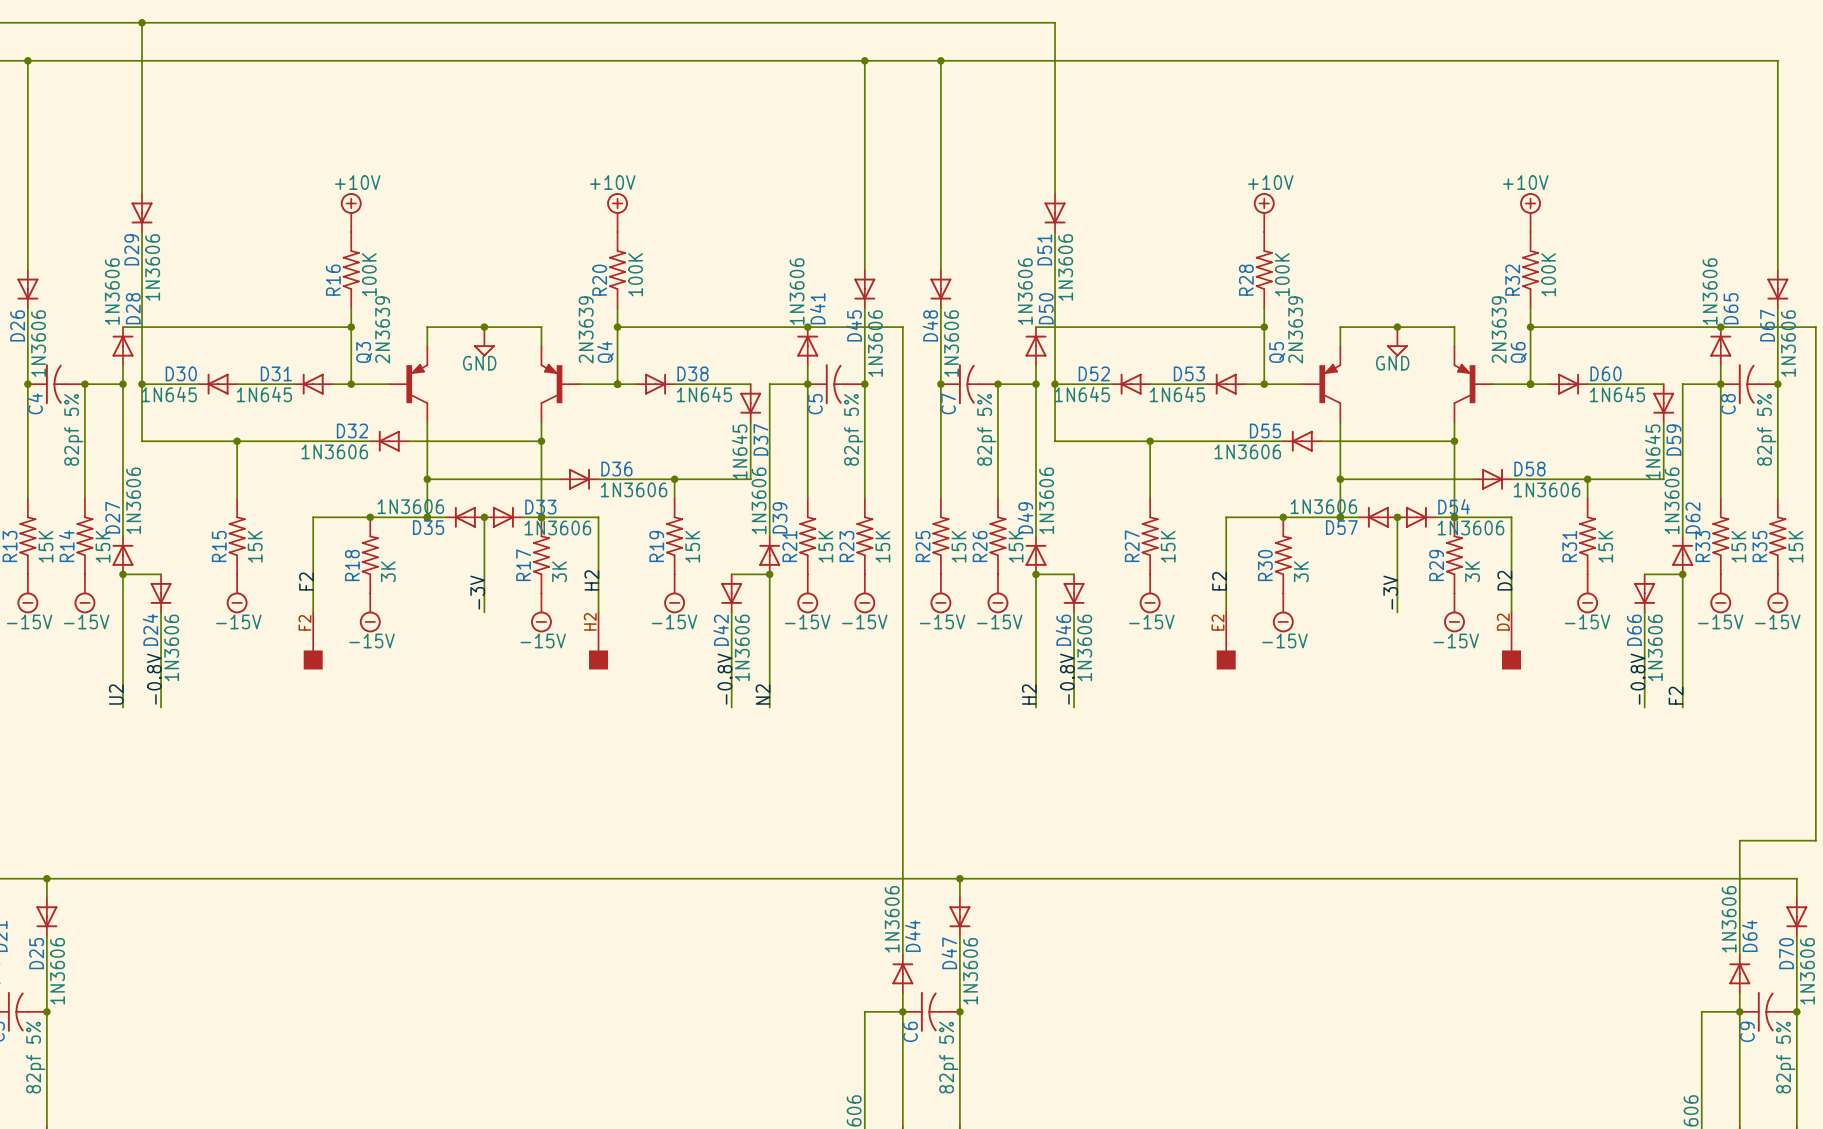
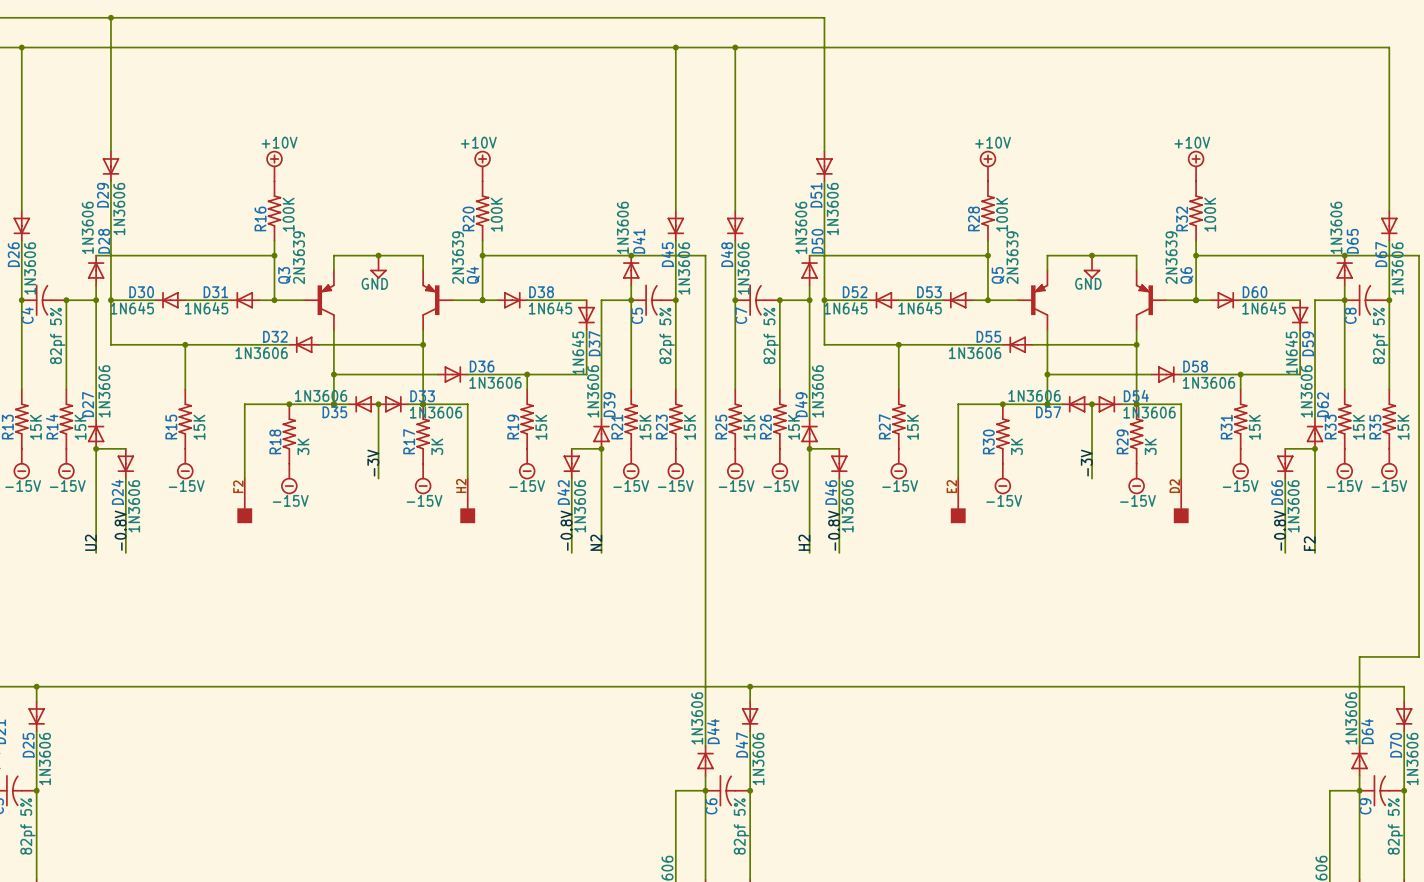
label: H2 (591, 580) -> none
label: D2 (1504, 580) -> none
label: F2 (306, 581) -> none
label: E2 (1219, 581) -> none

